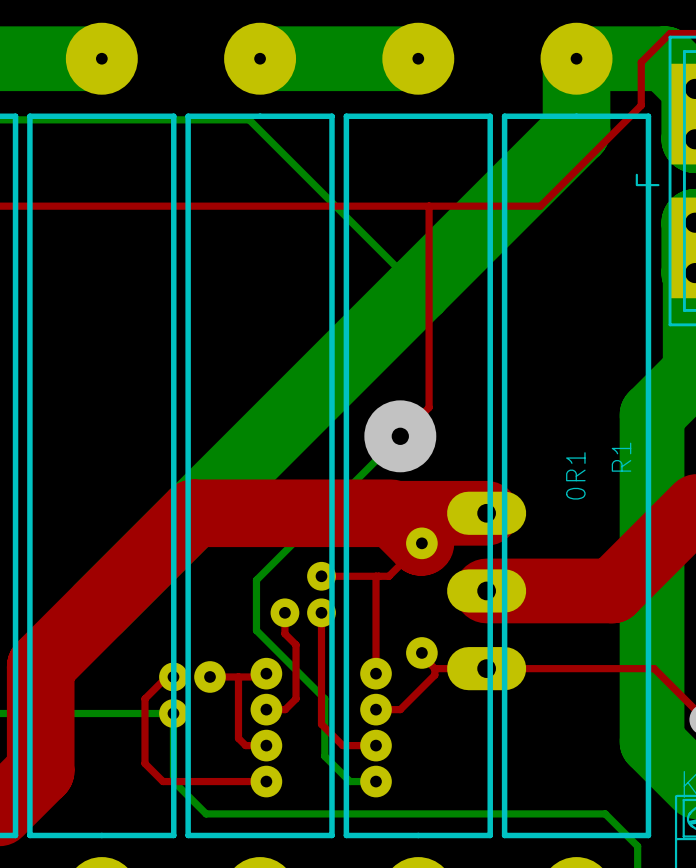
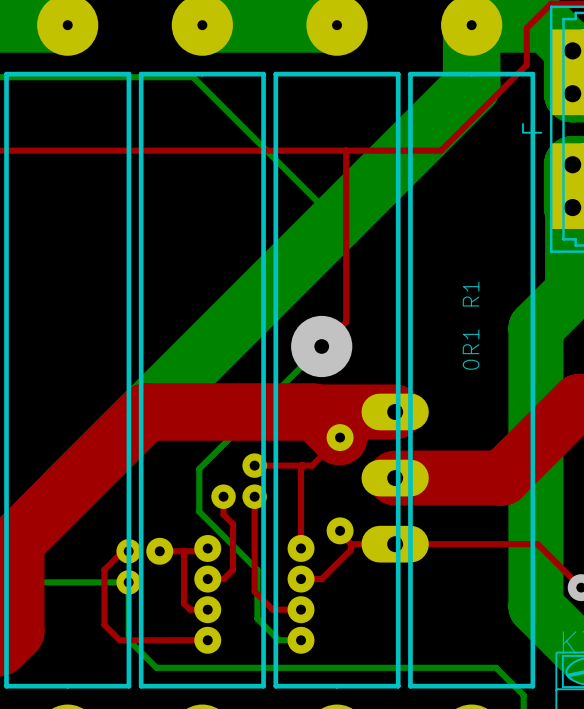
R1 name position: R1 (621, 457) -> R1 (471, 294)
R1 value position: 0R1 (575, 475) -> 0R1 (471, 349)

